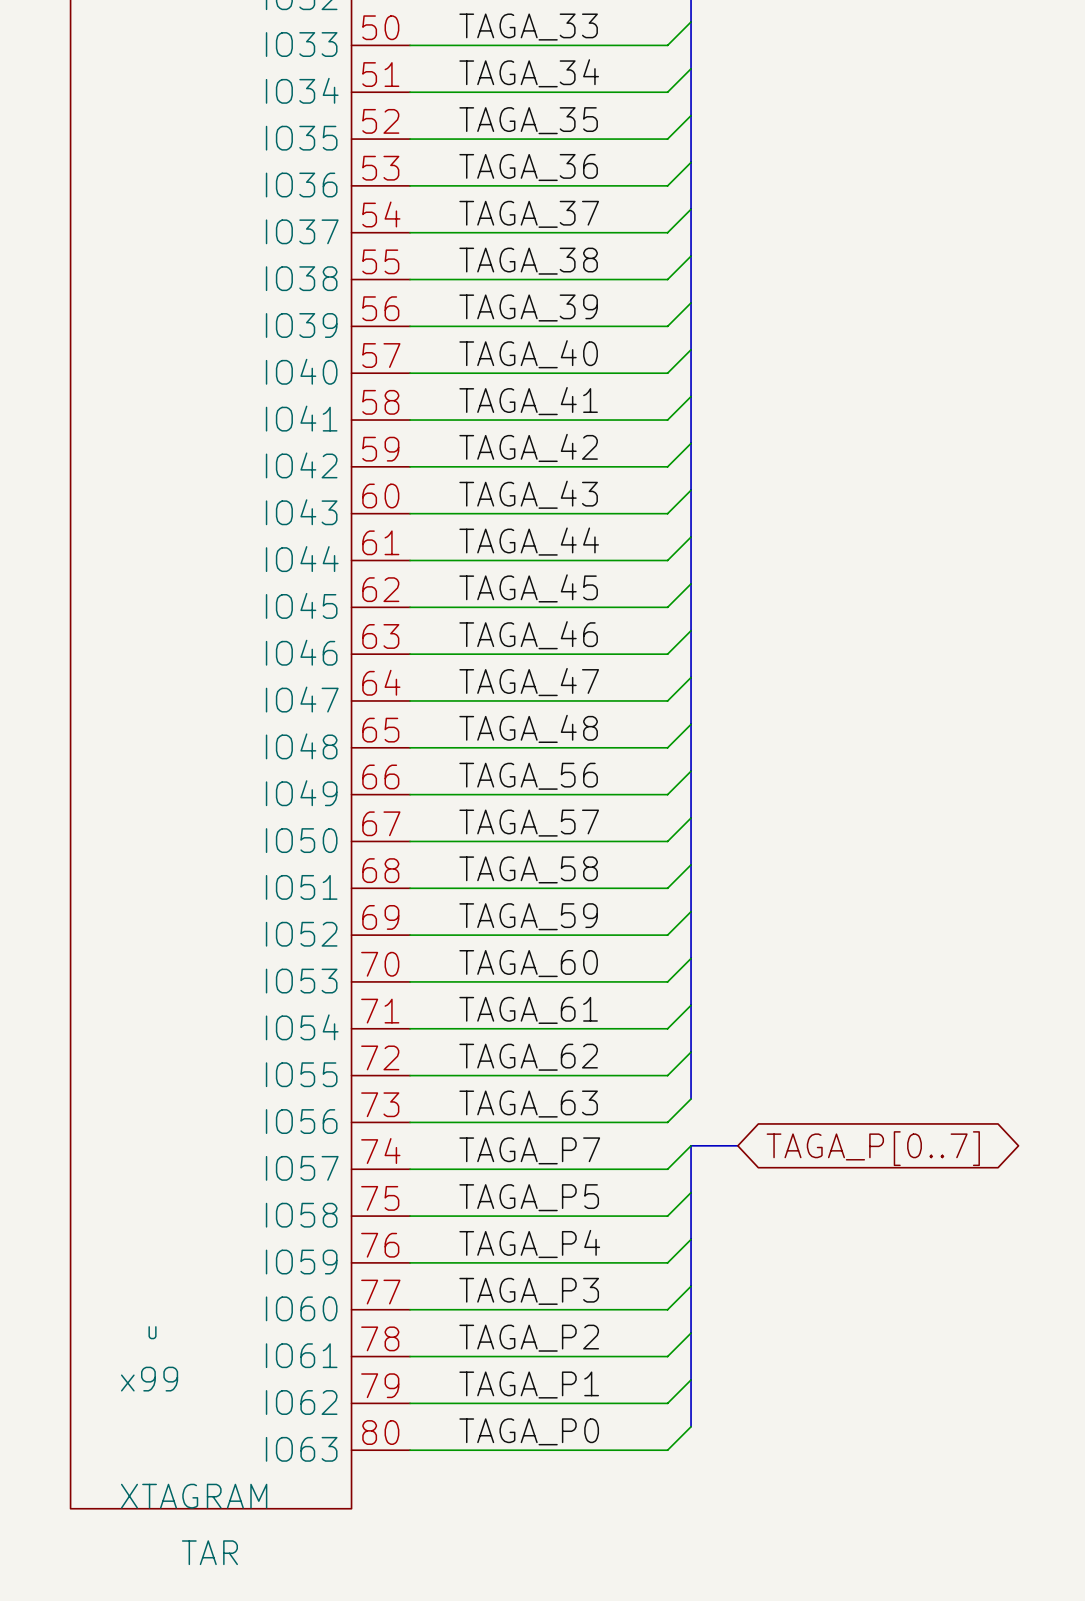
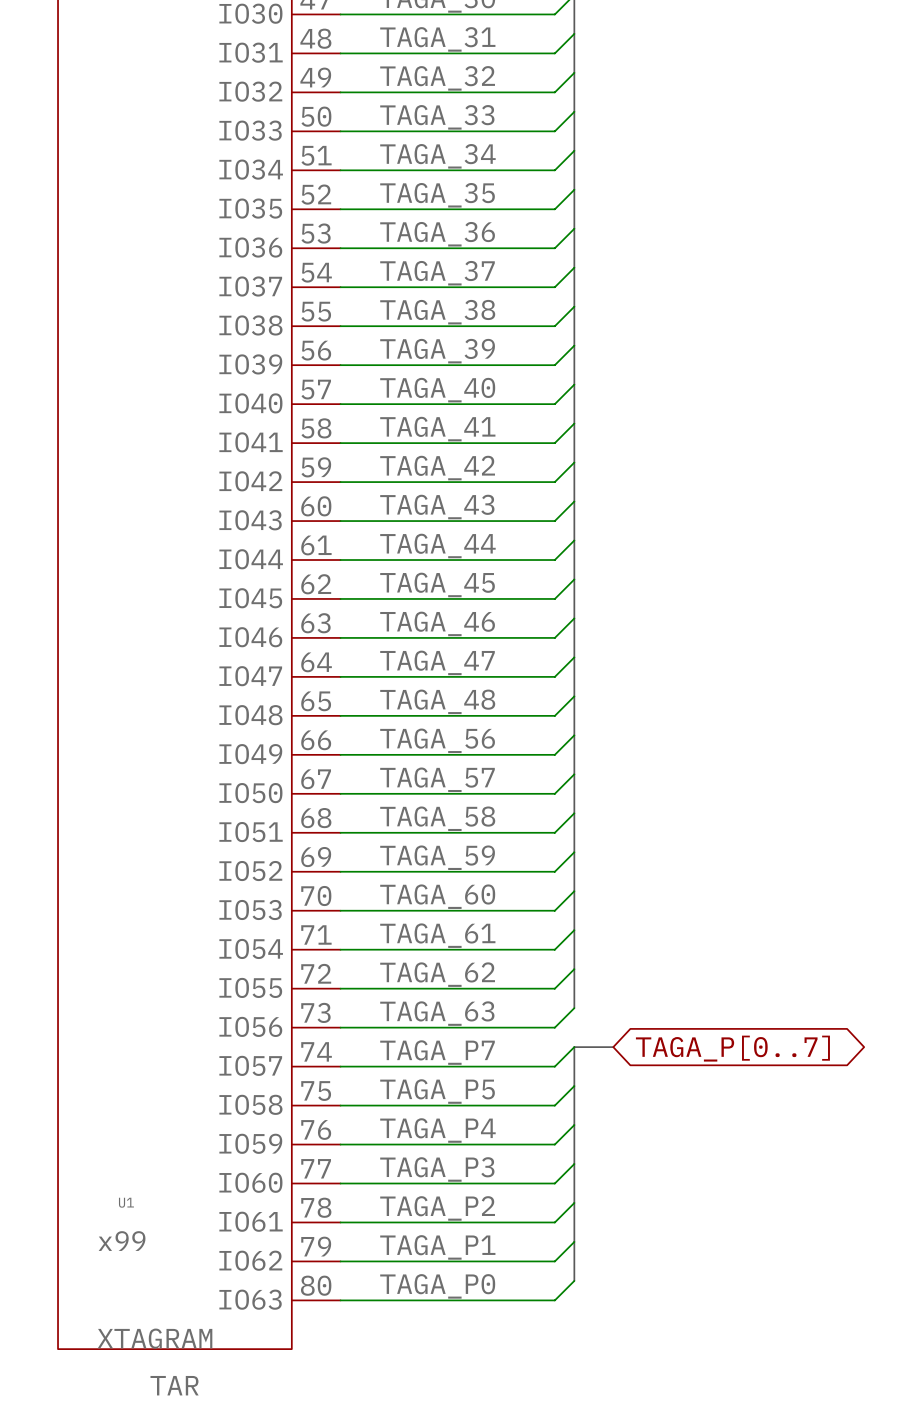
U name: U (152, 1332) -> U1 (126, 1202)

